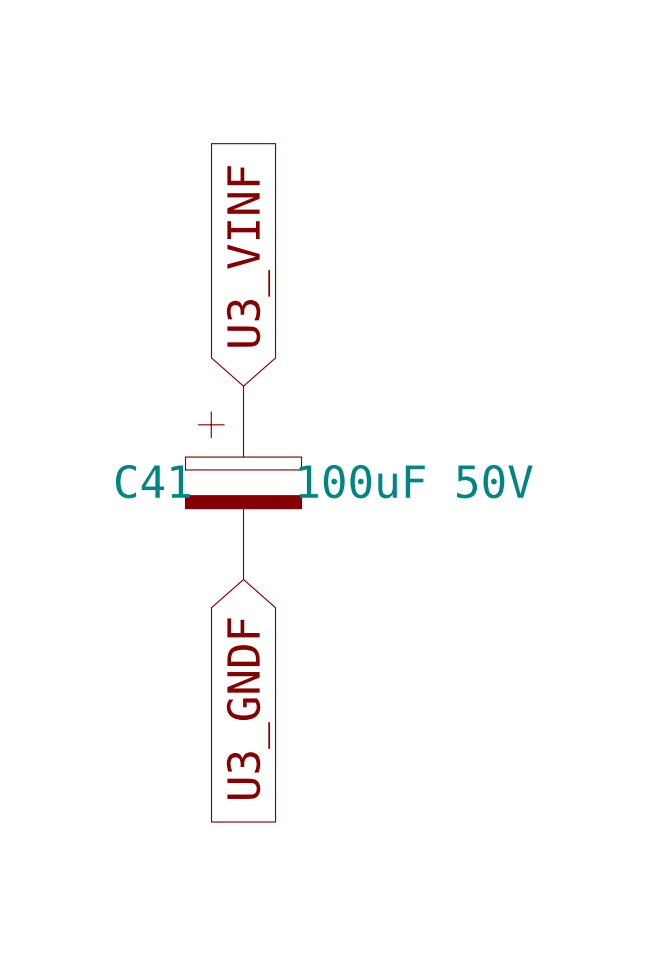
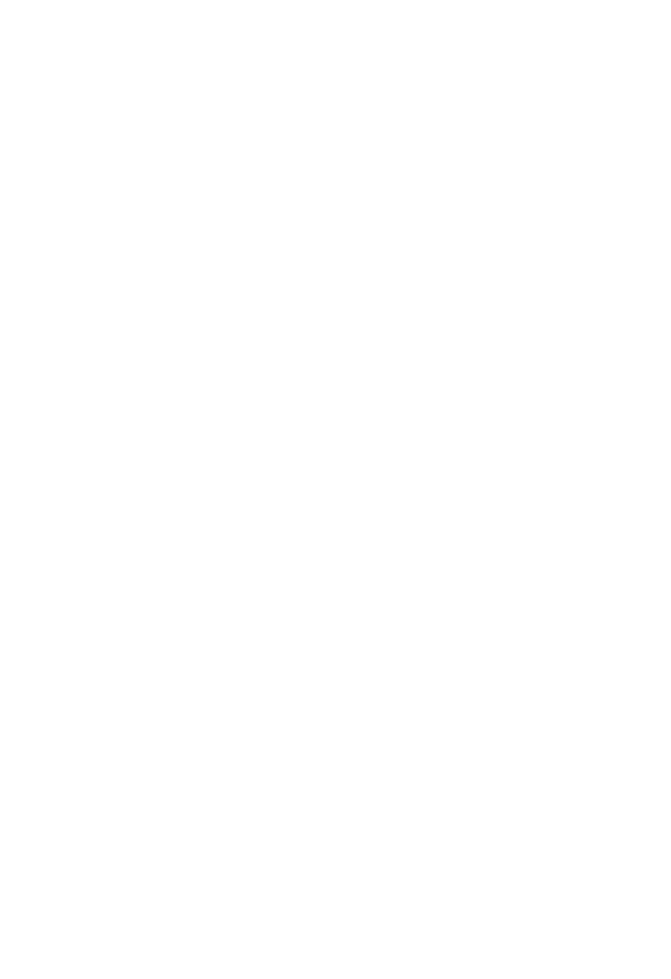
global label: U3_VINF (248, 256) -> none
C41: 100uF 50V (243, 482) -> none
global label: U3_GNDF (248, 708) -> none

